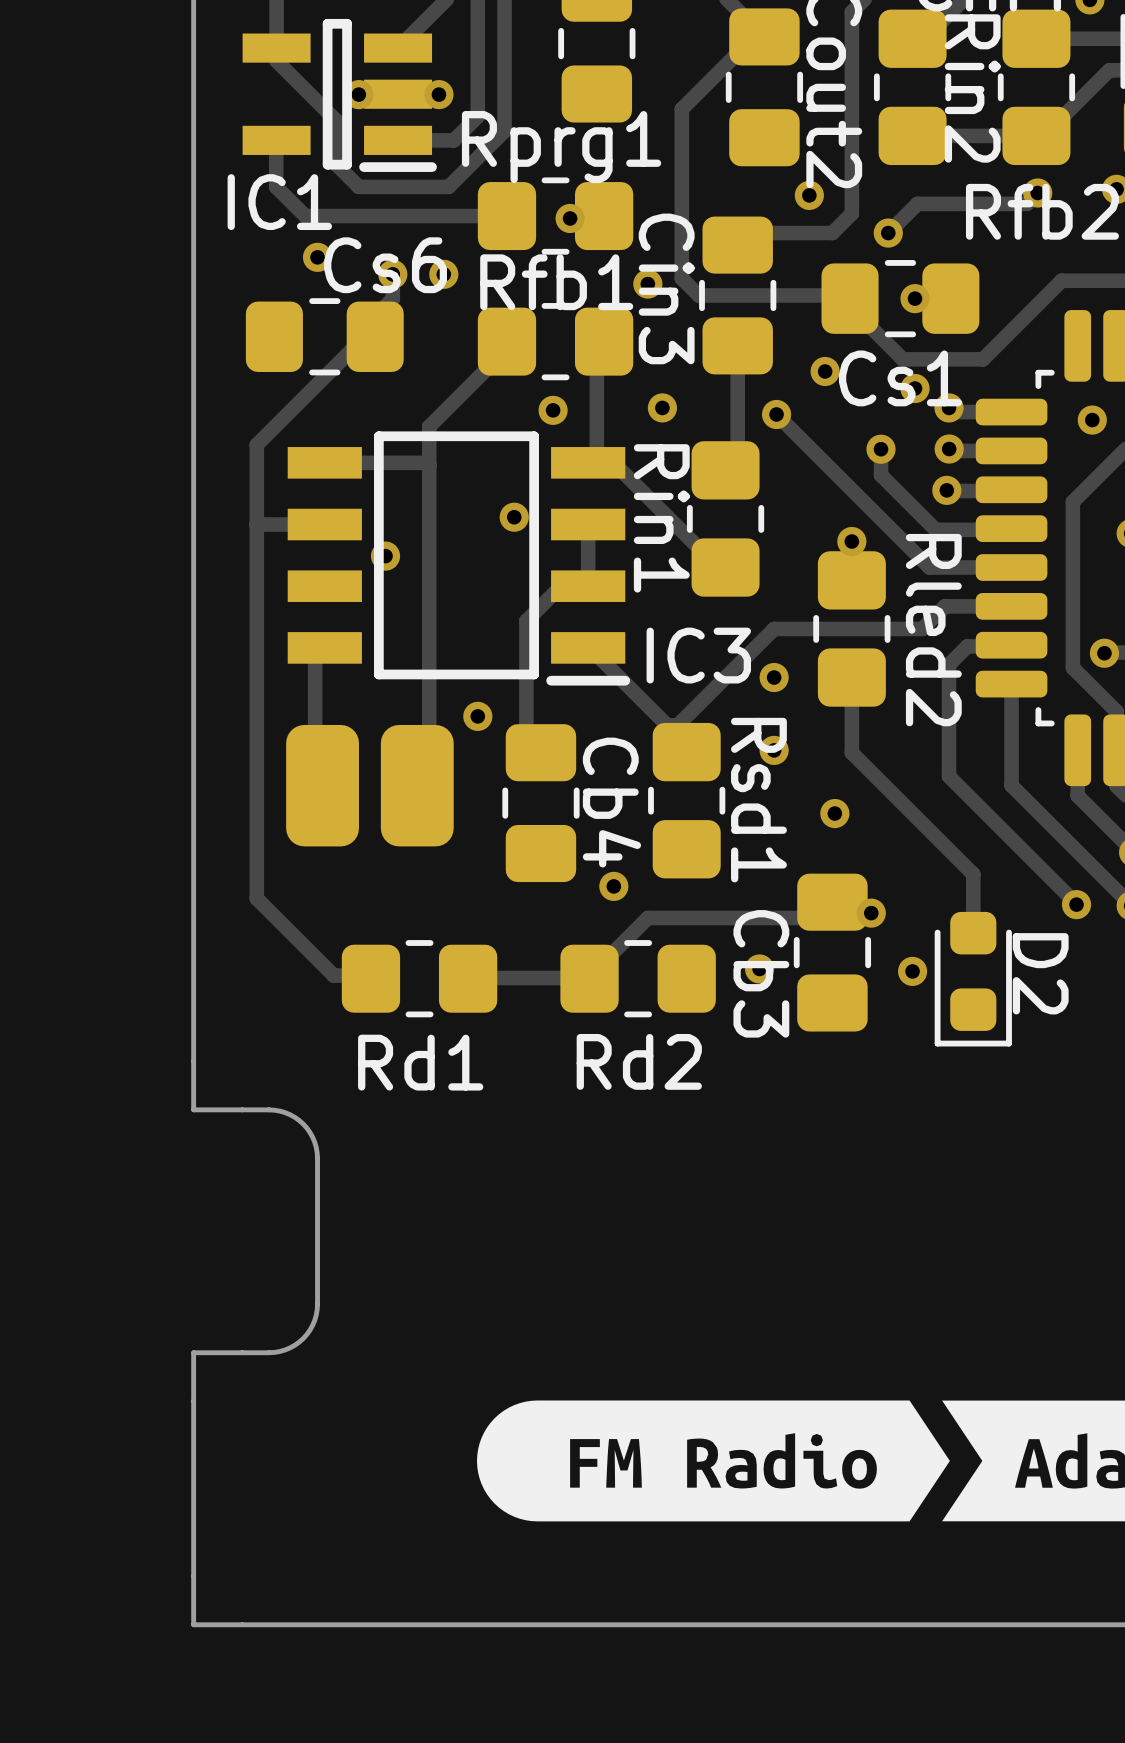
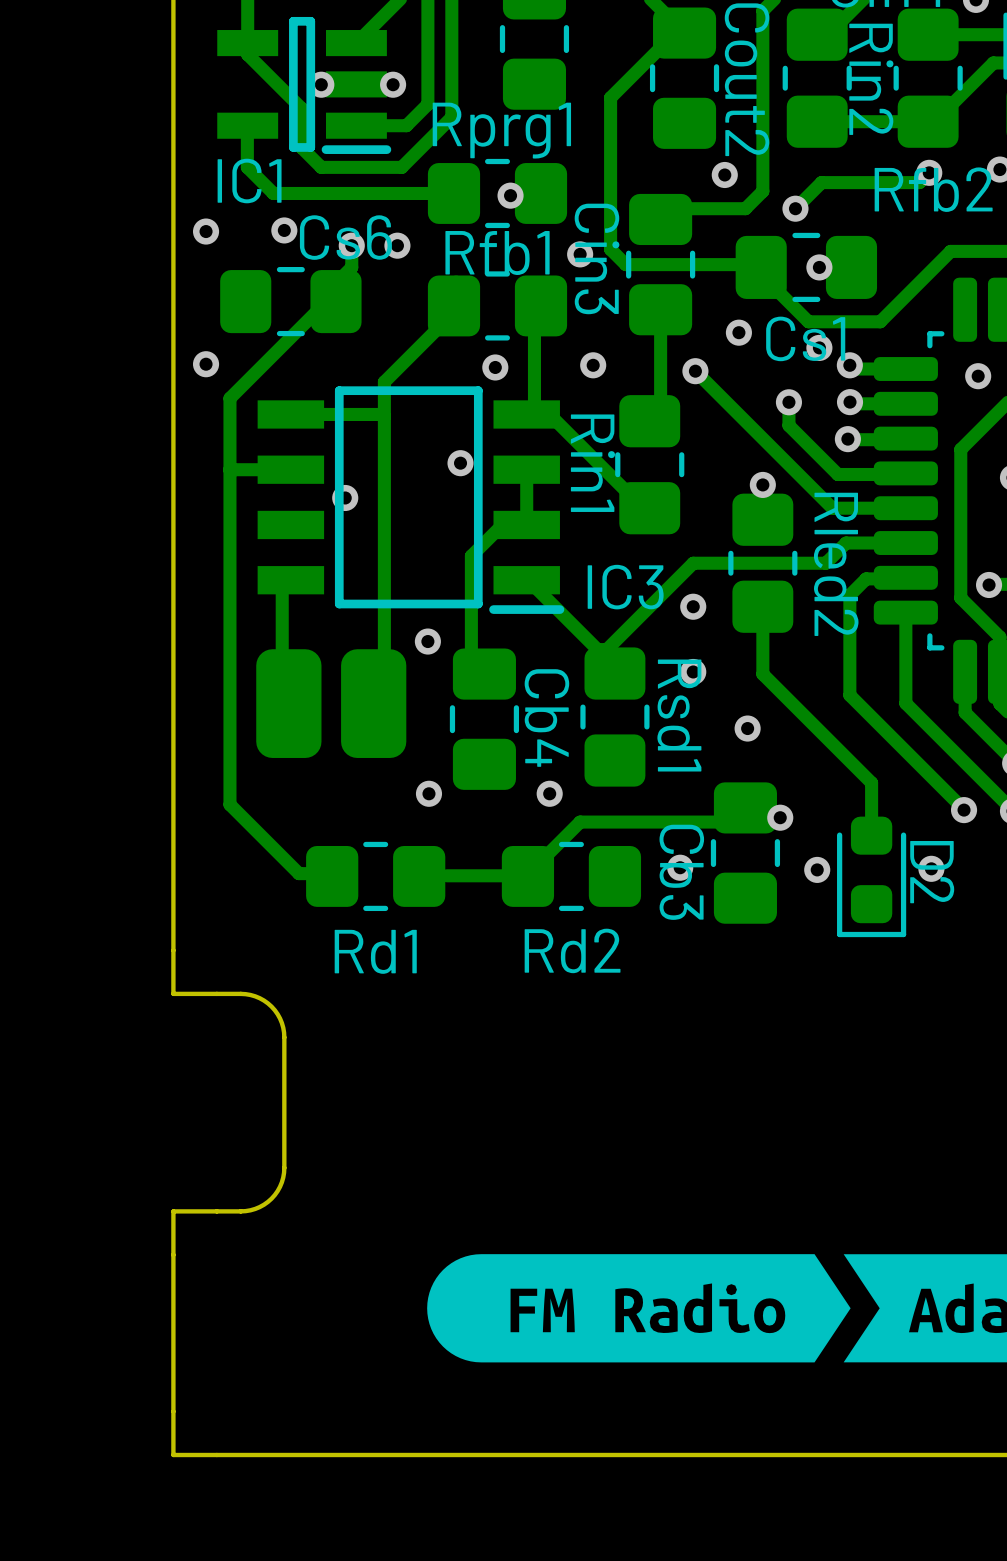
via: none -> (206, 231)
via: none -> (206, 364)
via: none -> (428, 793)
via: none -> (931, 868)

